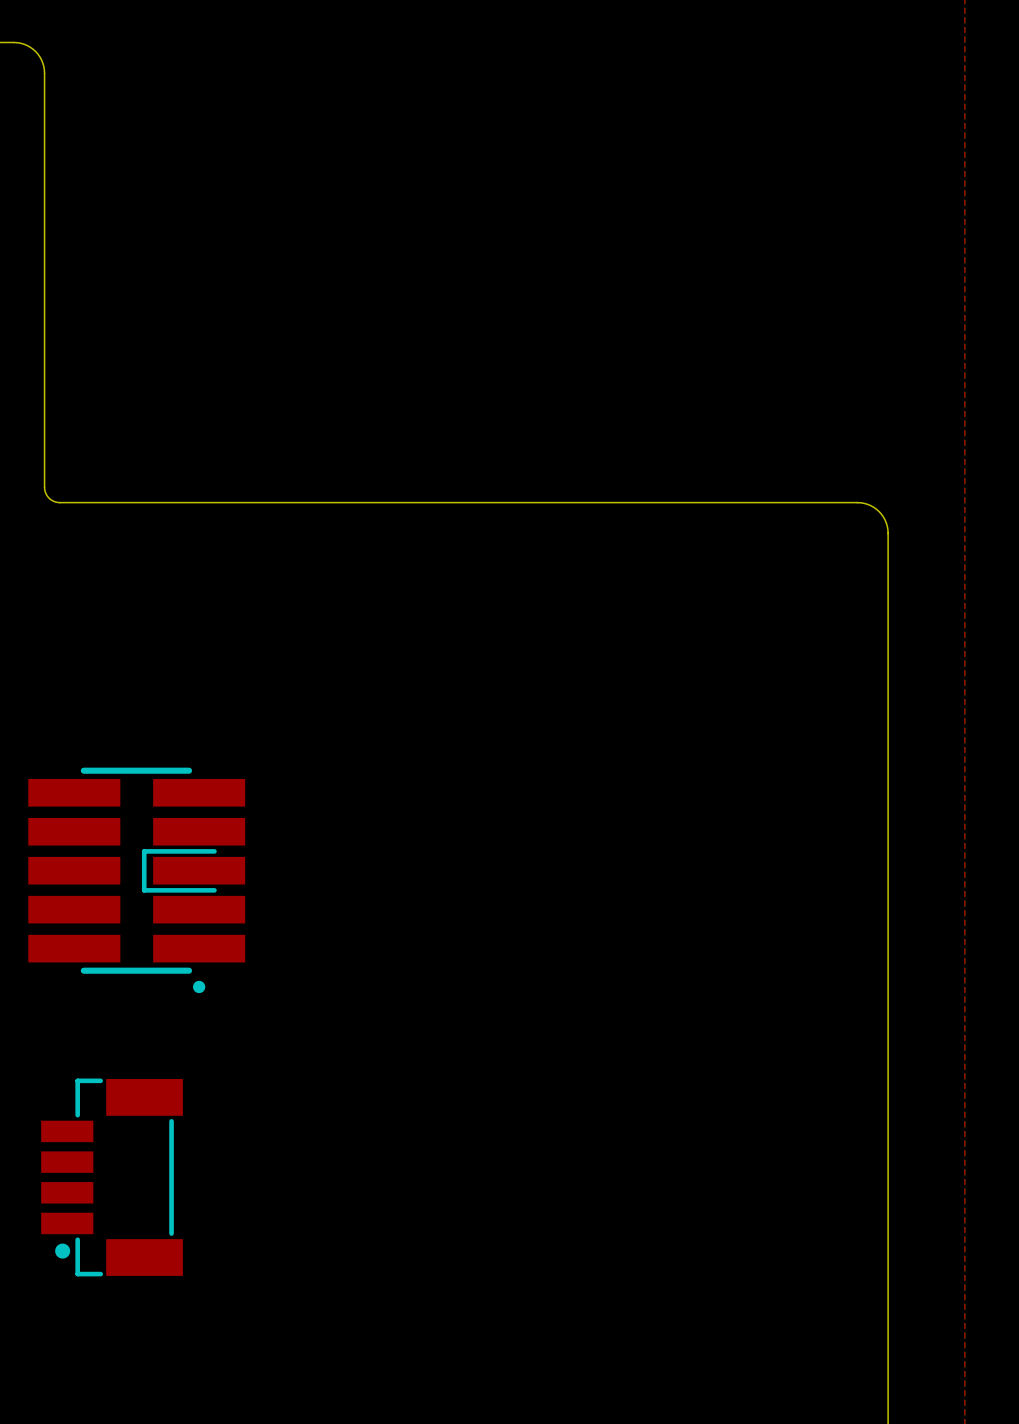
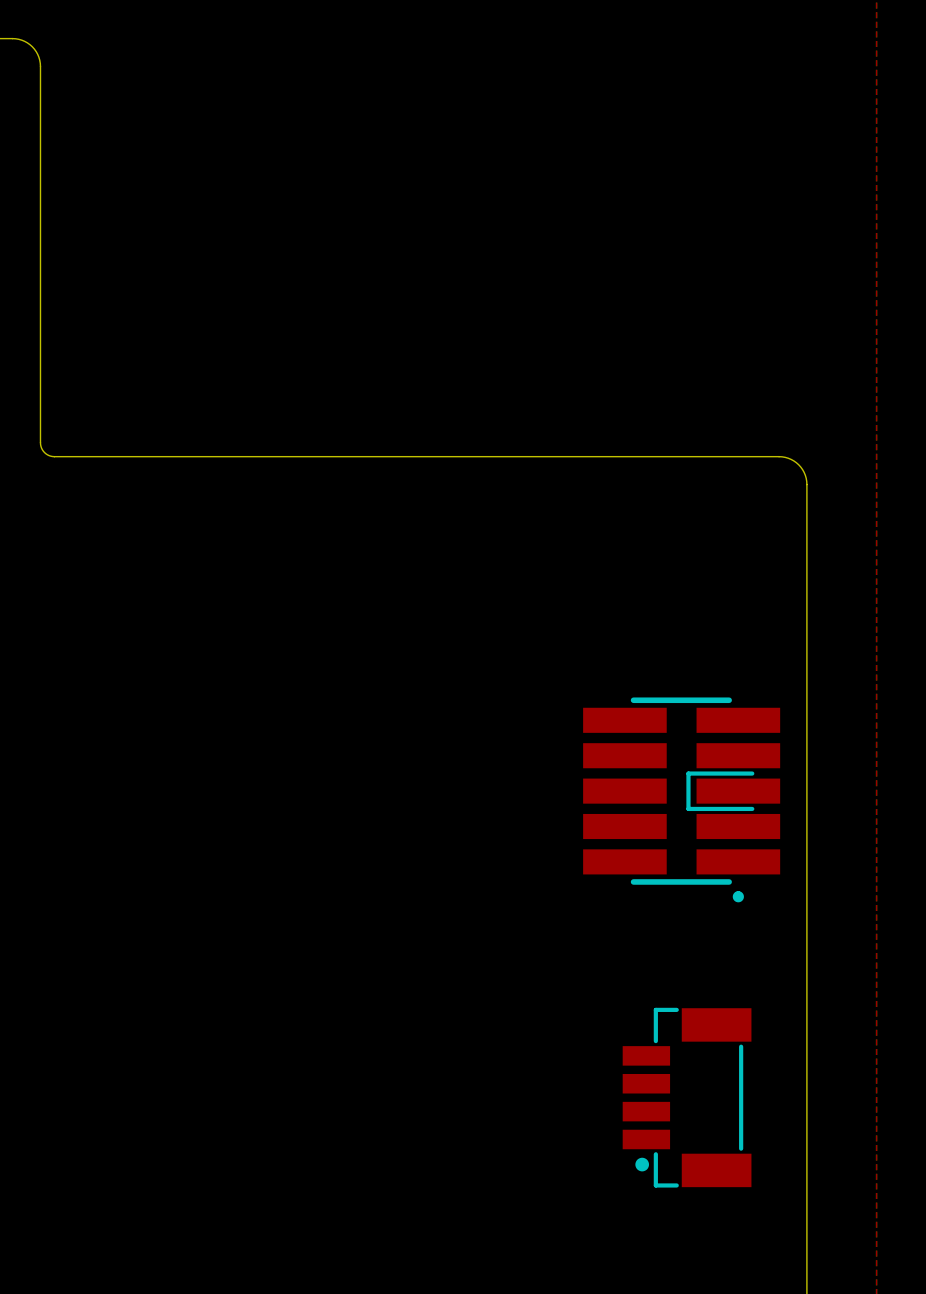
part position: (136, 880) -> (681, 799)
part position: (112, 1177) -> (687, 1097)

